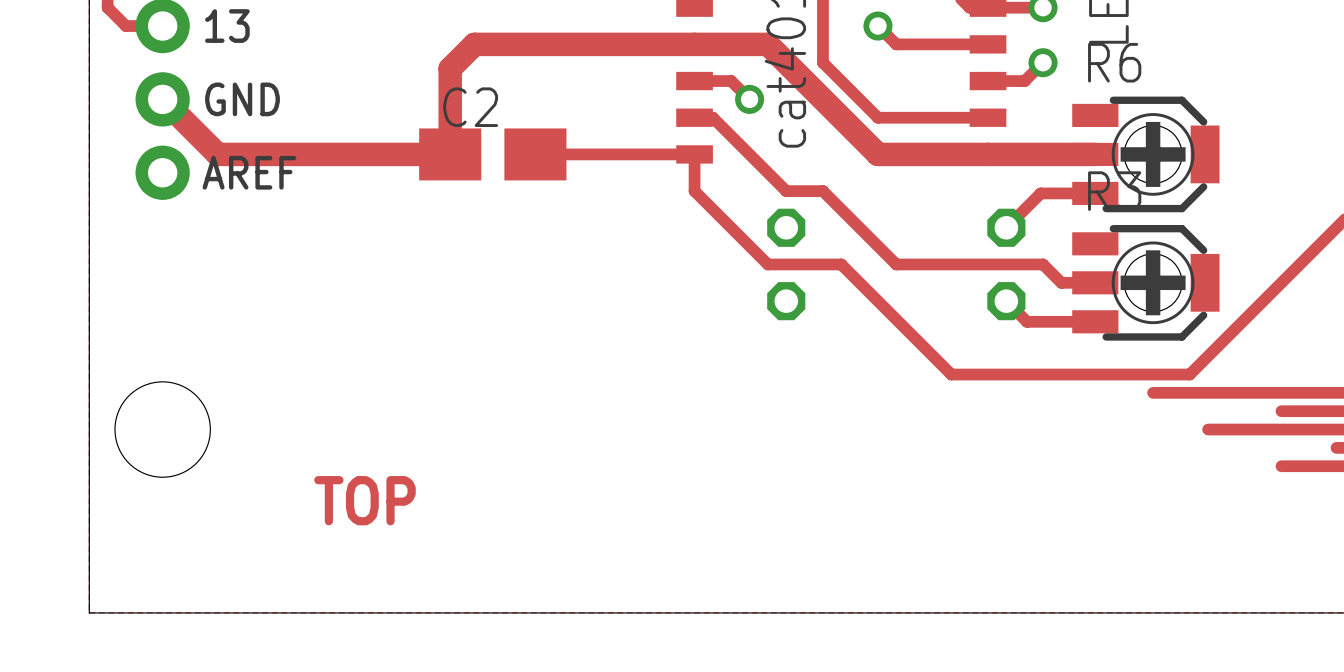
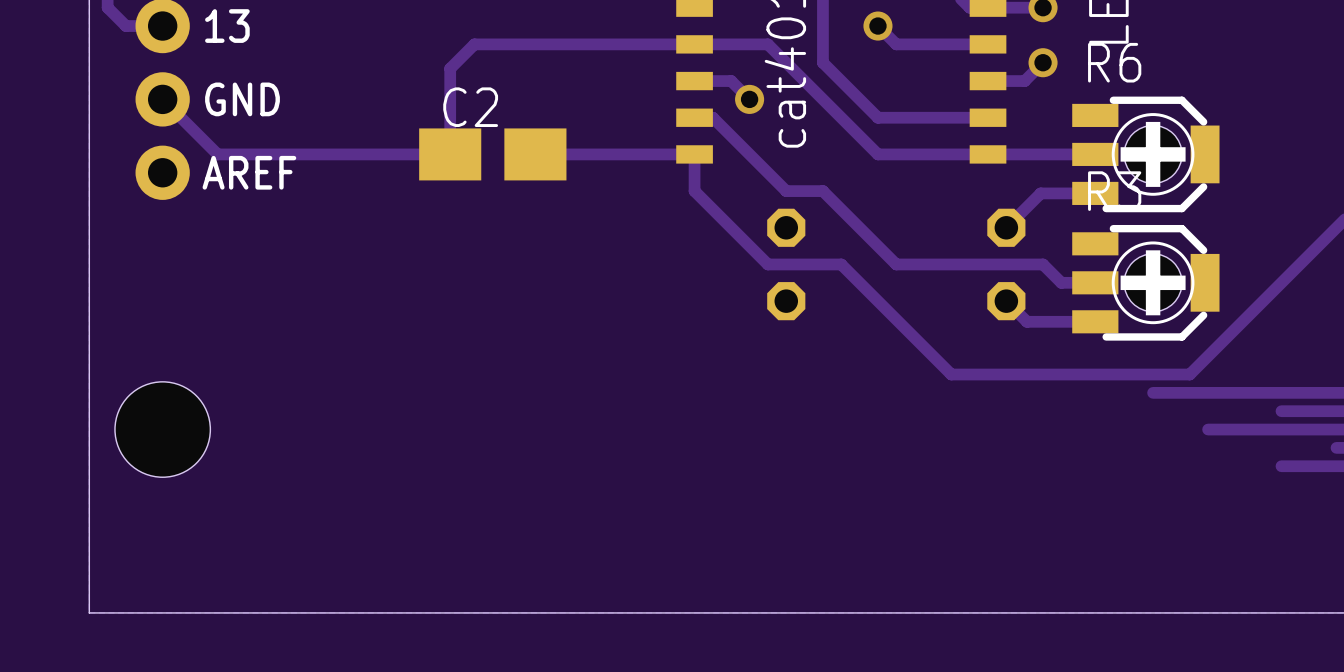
track width: thick (162, 99) (217, 154) (450, 154) (450, 68) (474, 44) (767, 44) (877, 154) (1095, 154) -> thin (162, 99) (217, 154) (450, 154) (450, 68) (474, 44) (767, 44) (877, 154) (1095, 154)
text: TOP (364, 500) -> none

